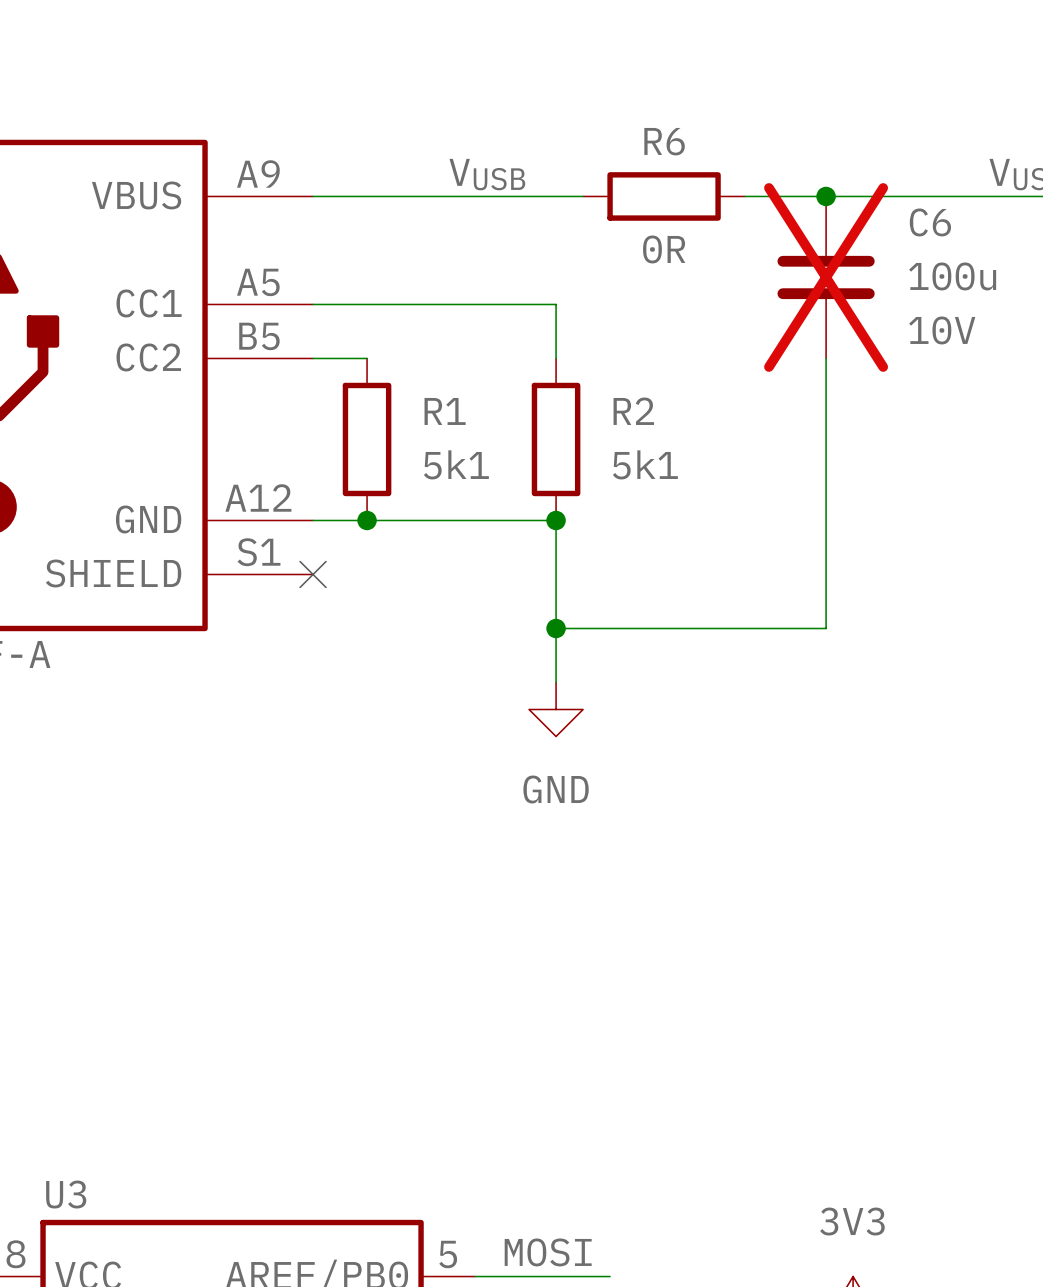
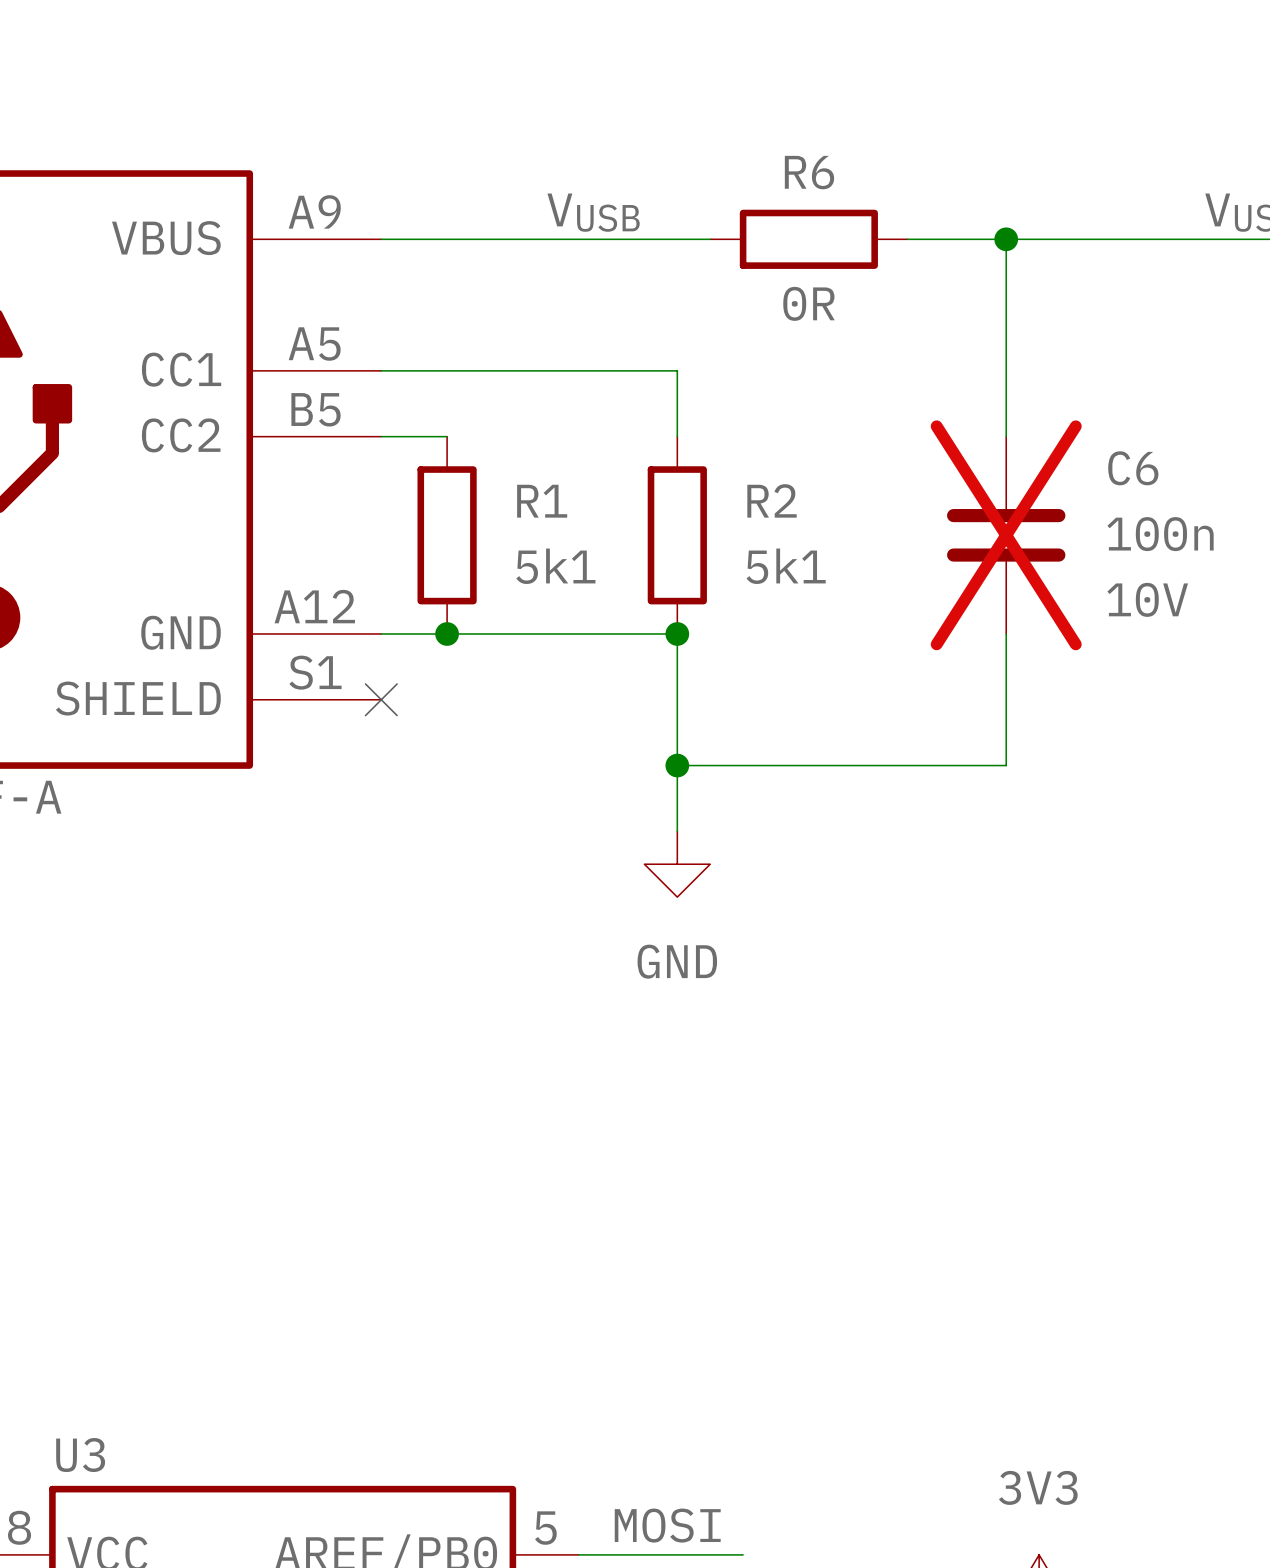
C6 value: 100u (952, 276) -> 100n (1160, 534)
C6 position: (826, 277) -> (1006, 535)

